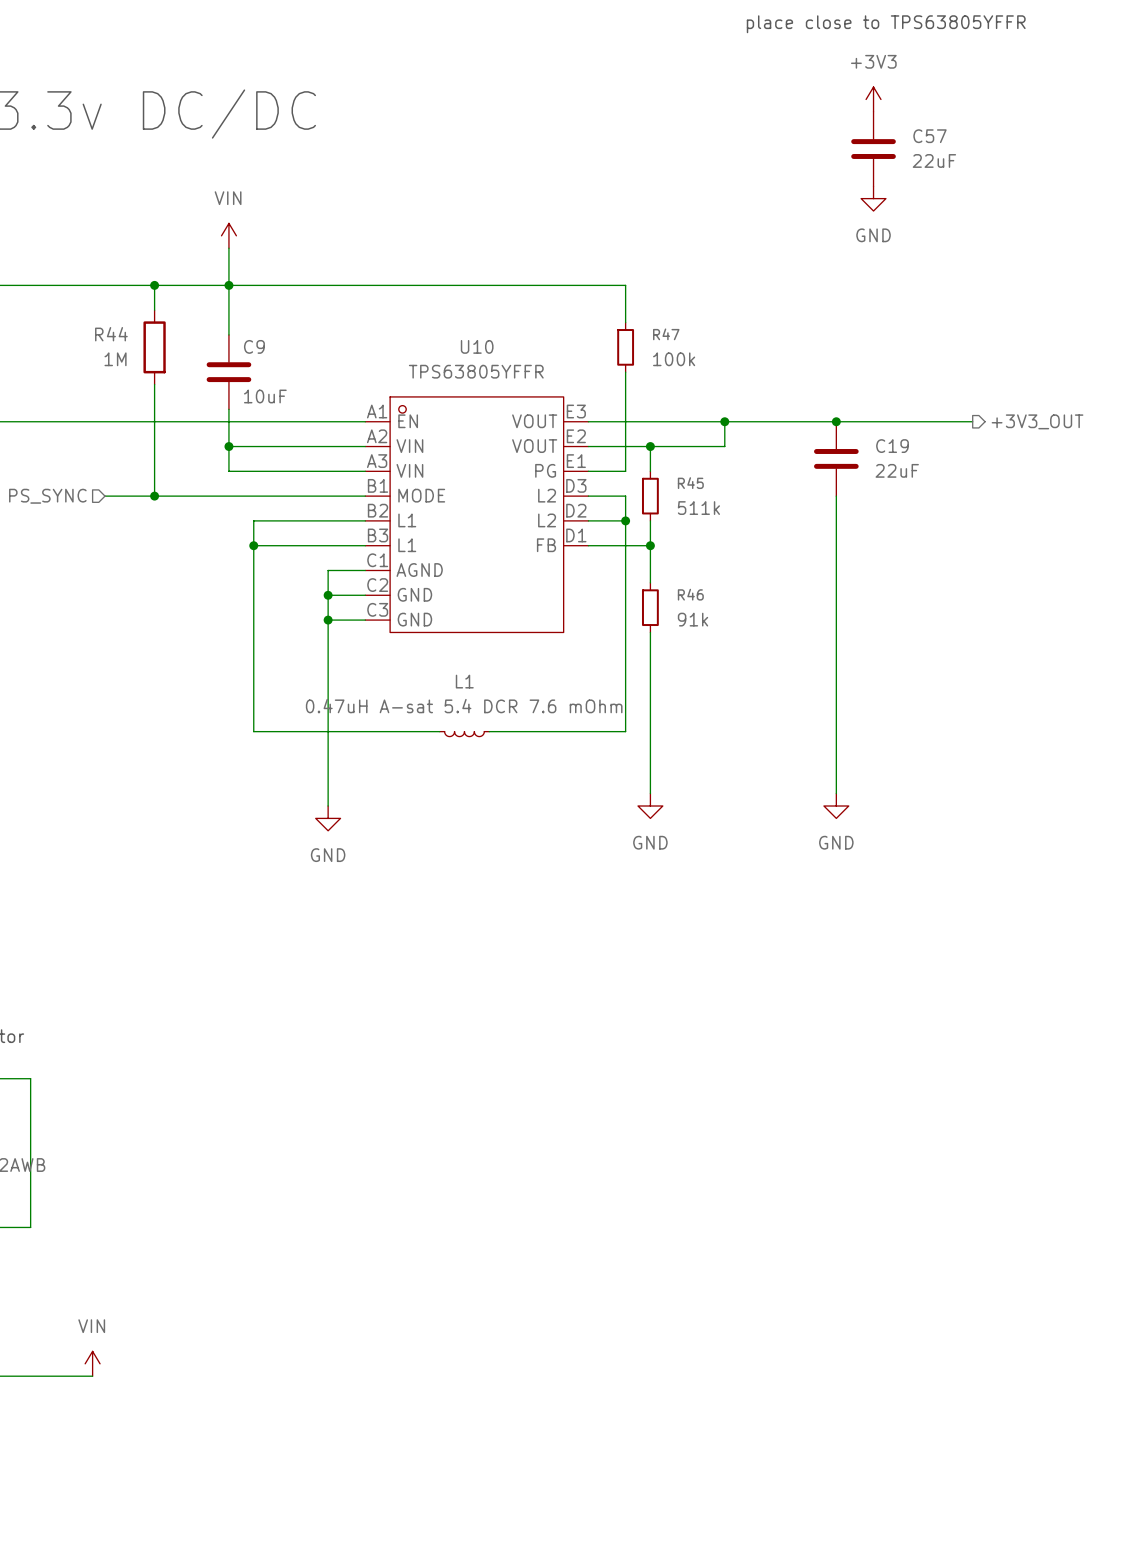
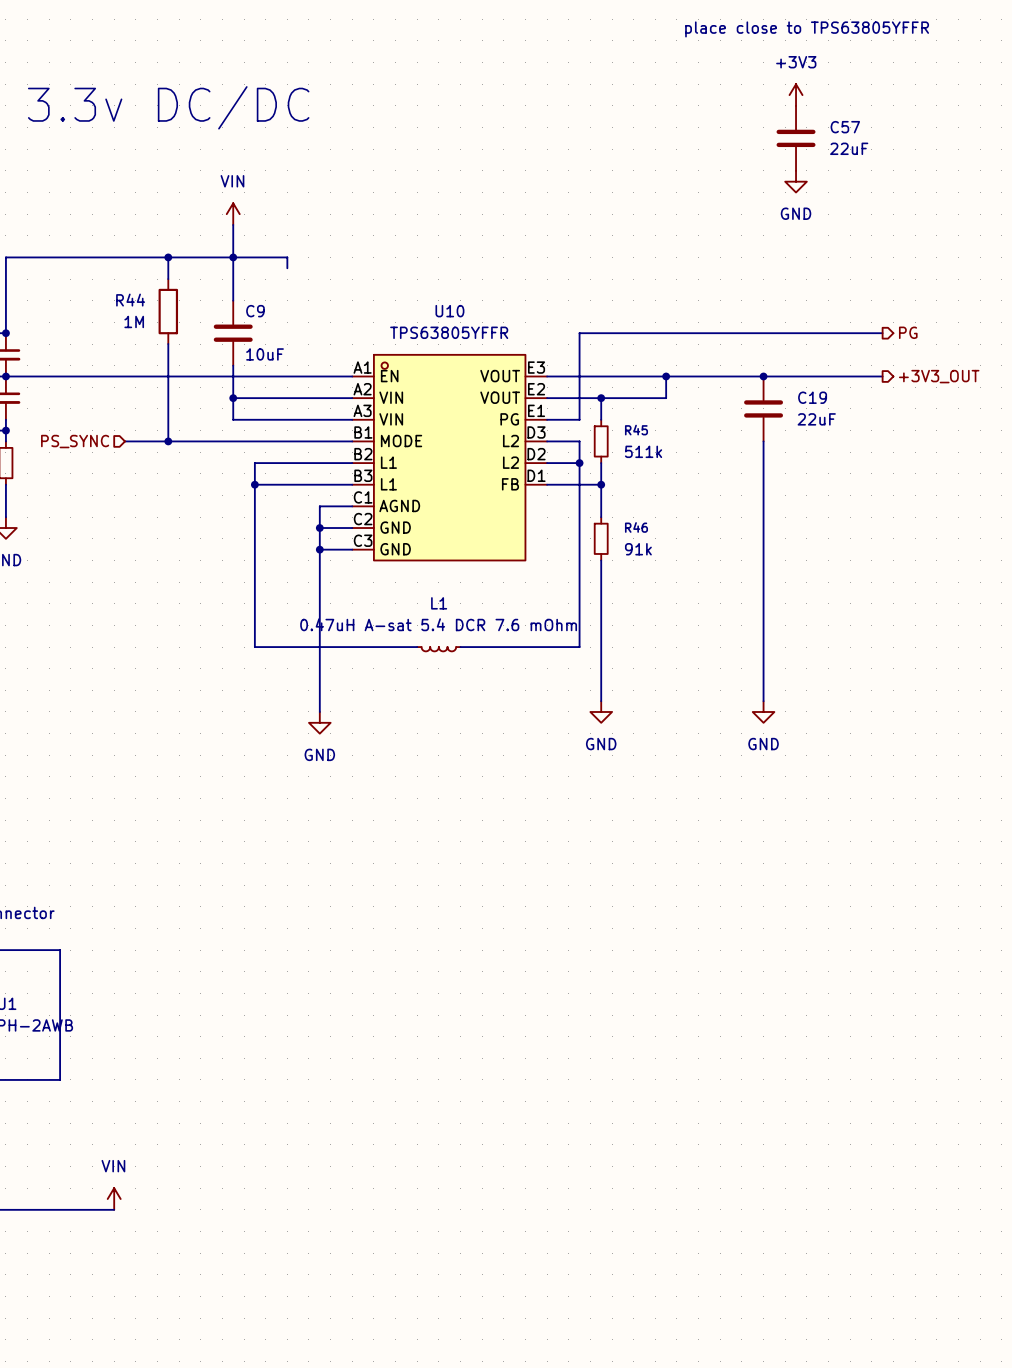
wire: (290, 285) (625, 285) (625, 322) -> (287, 257) (287, 268)
R47: 100k (625, 347) -> none
hierarchical label: none -> PG (908, 332)
wire: none -> (579, 333) (882, 333)

